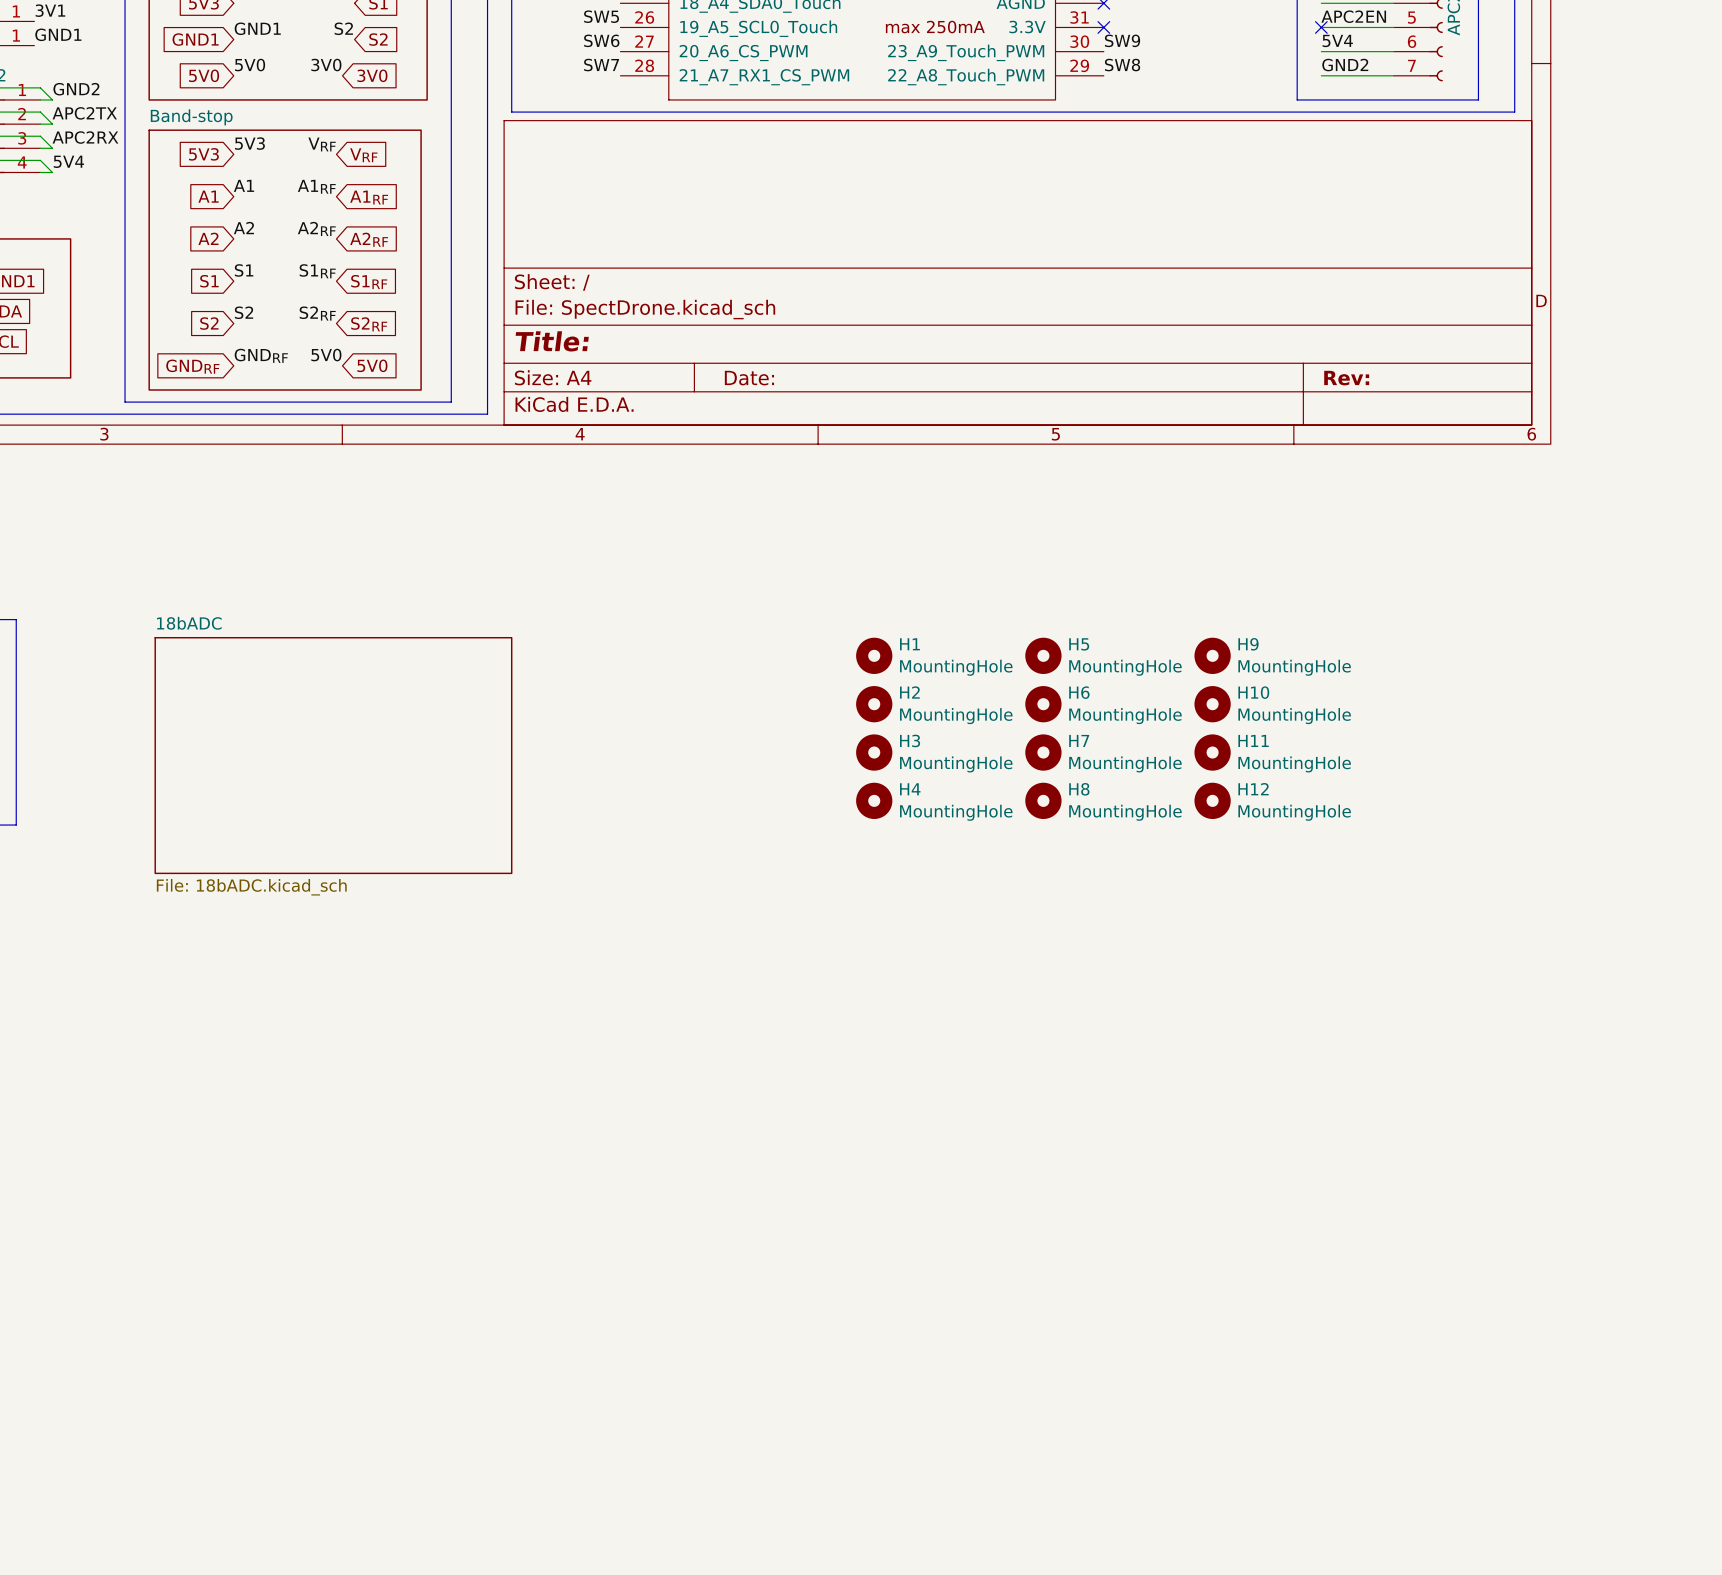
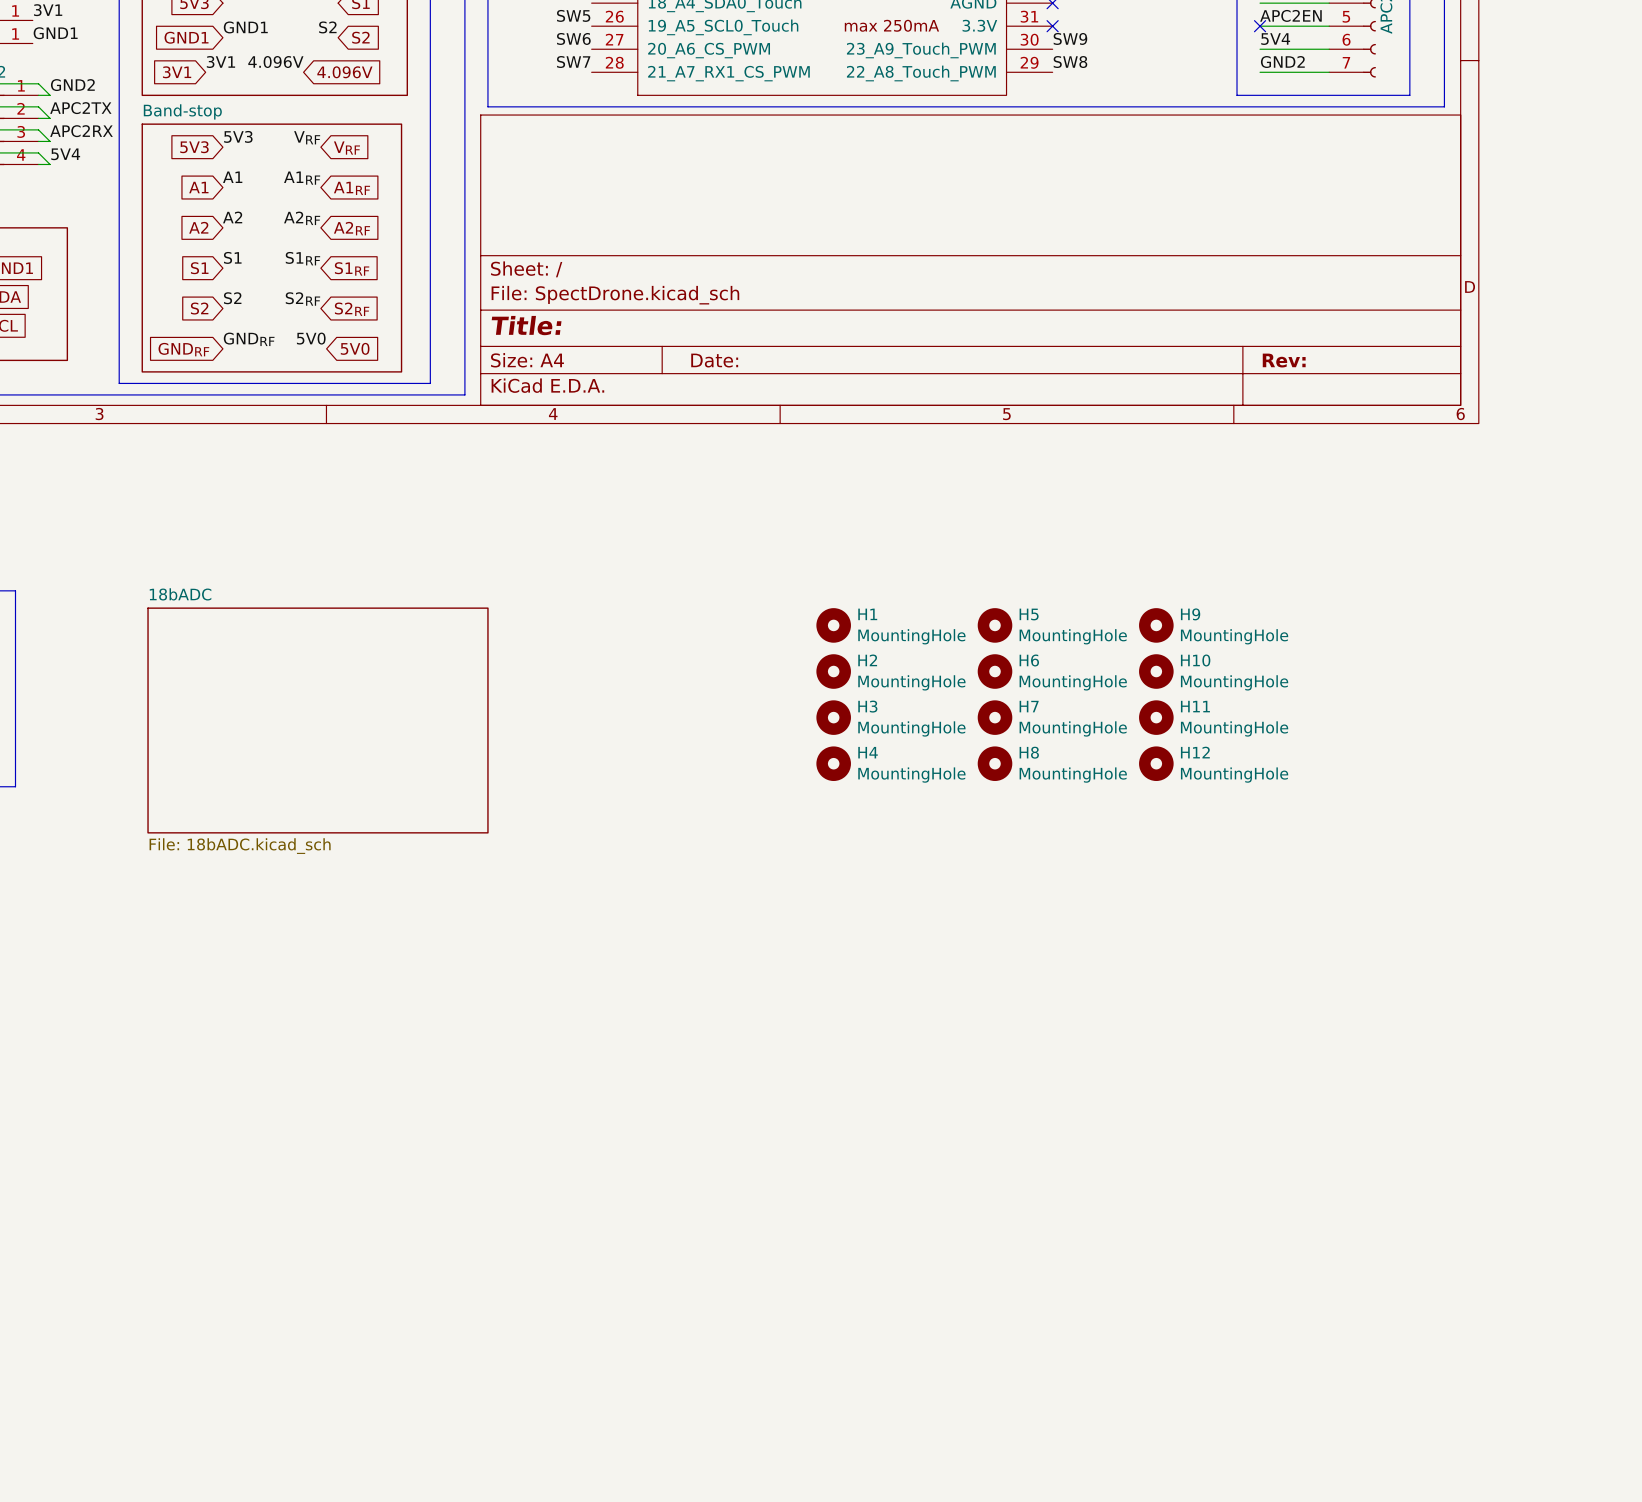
label: none -> 3V1 (220, 62)
label: 5V0 (250, 65) -> none
label: none -> 4.096V (275, 62)
label: 3V0 (326, 65) -> none
global label: none -> 3V1 (177, 72)
global label: 5V0 (204, 75) -> none
global label: none -> 4.096V (344, 72)
global label: 3V0 (372, 75) -> none

